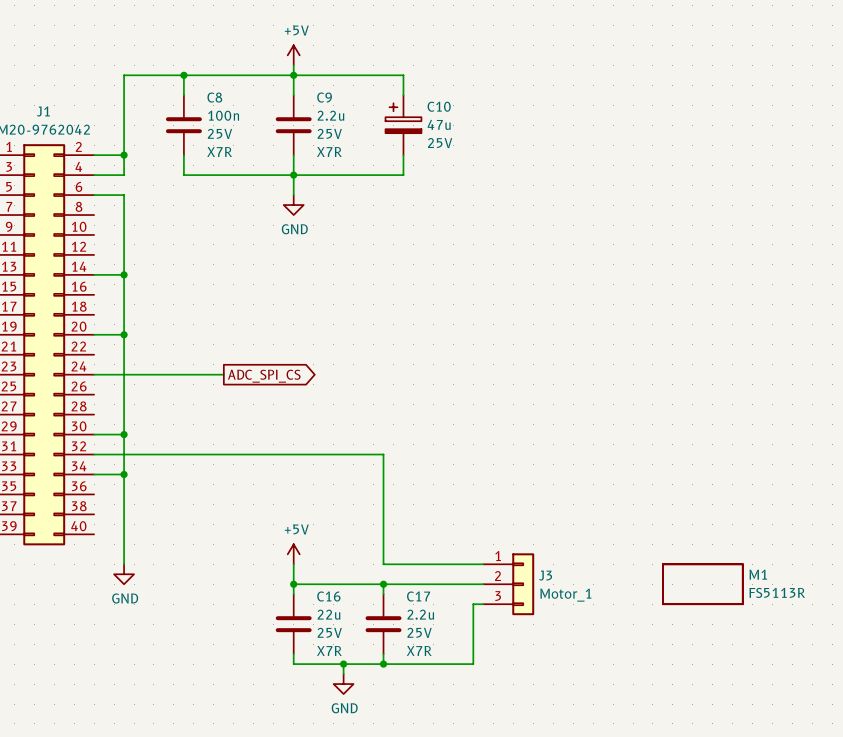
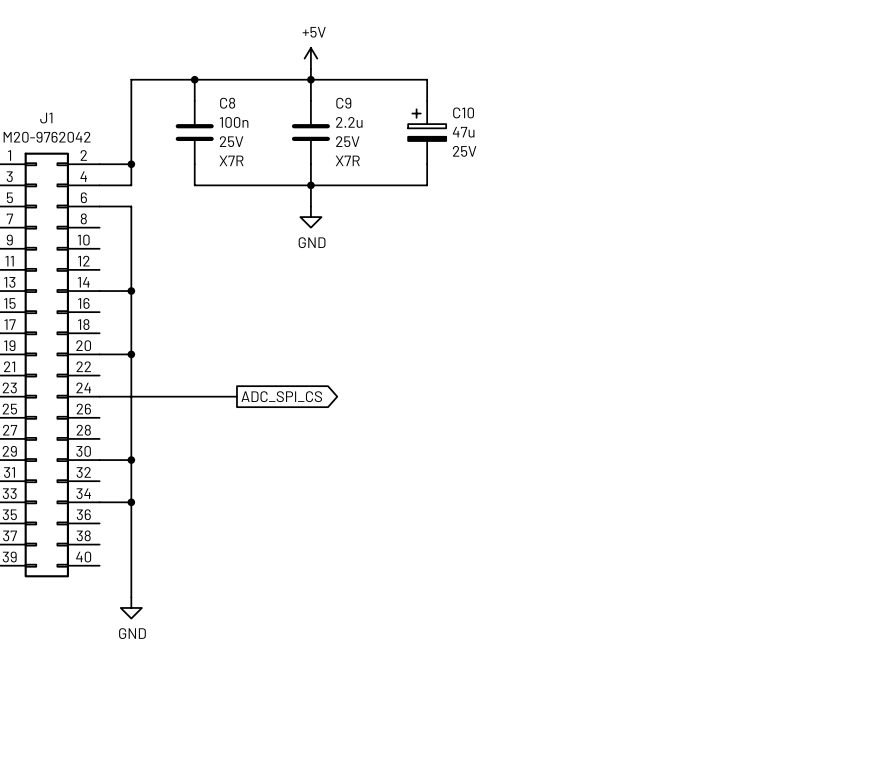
wire: (94, 454) (383, 454) (383, 564) (483, 564) -> none
power symbol: +5V (293, 554) -> none
wire: (293, 564) (293, 594) -> none
wire: (293, 584) (483, 584) -> none
junction: (293, 584) -> none
wire: (383, 584) (383, 594) -> none
junction: (383, 584) -> none
J3: Motor_1 (508, 584) -> none
M1: FS5113R (702, 584) -> none
wire: (483, 604) (473, 604) (473, 664) (293, 664) (293, 654) -> none
C16: 22u (293, 624) -> none
C17: 2.2u (383, 624) -> none
wire: (383, 654) (383, 664) -> none
wire: (343, 664) (343, 674) -> none
junction: (343, 664) -> none
junction: (383, 664) -> none
power symbol: GND (343, 684) -> none

